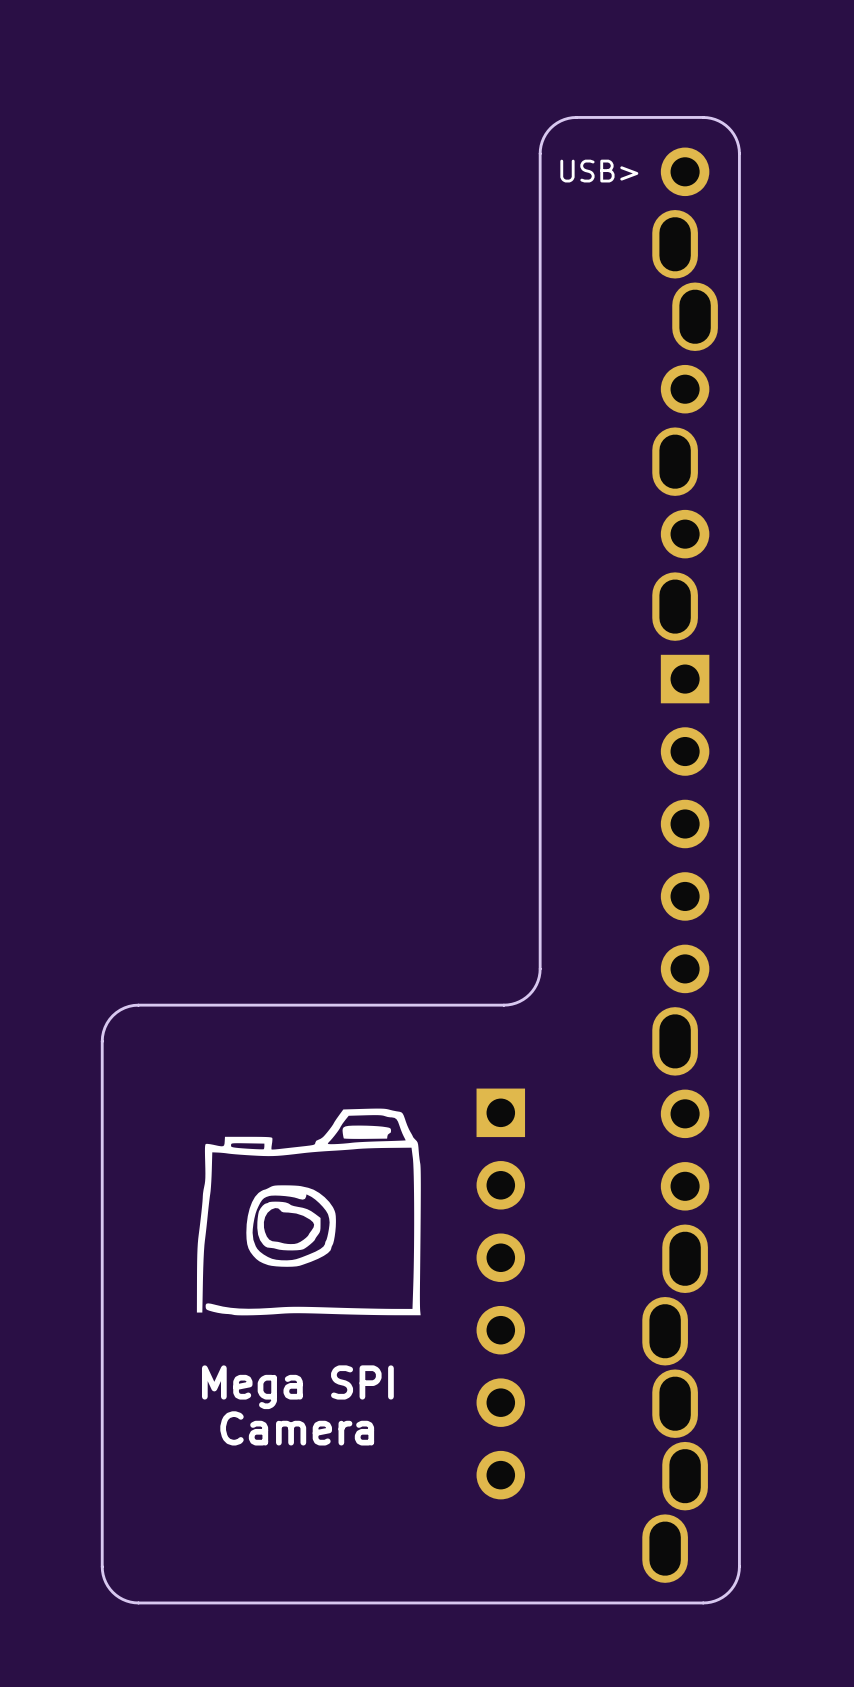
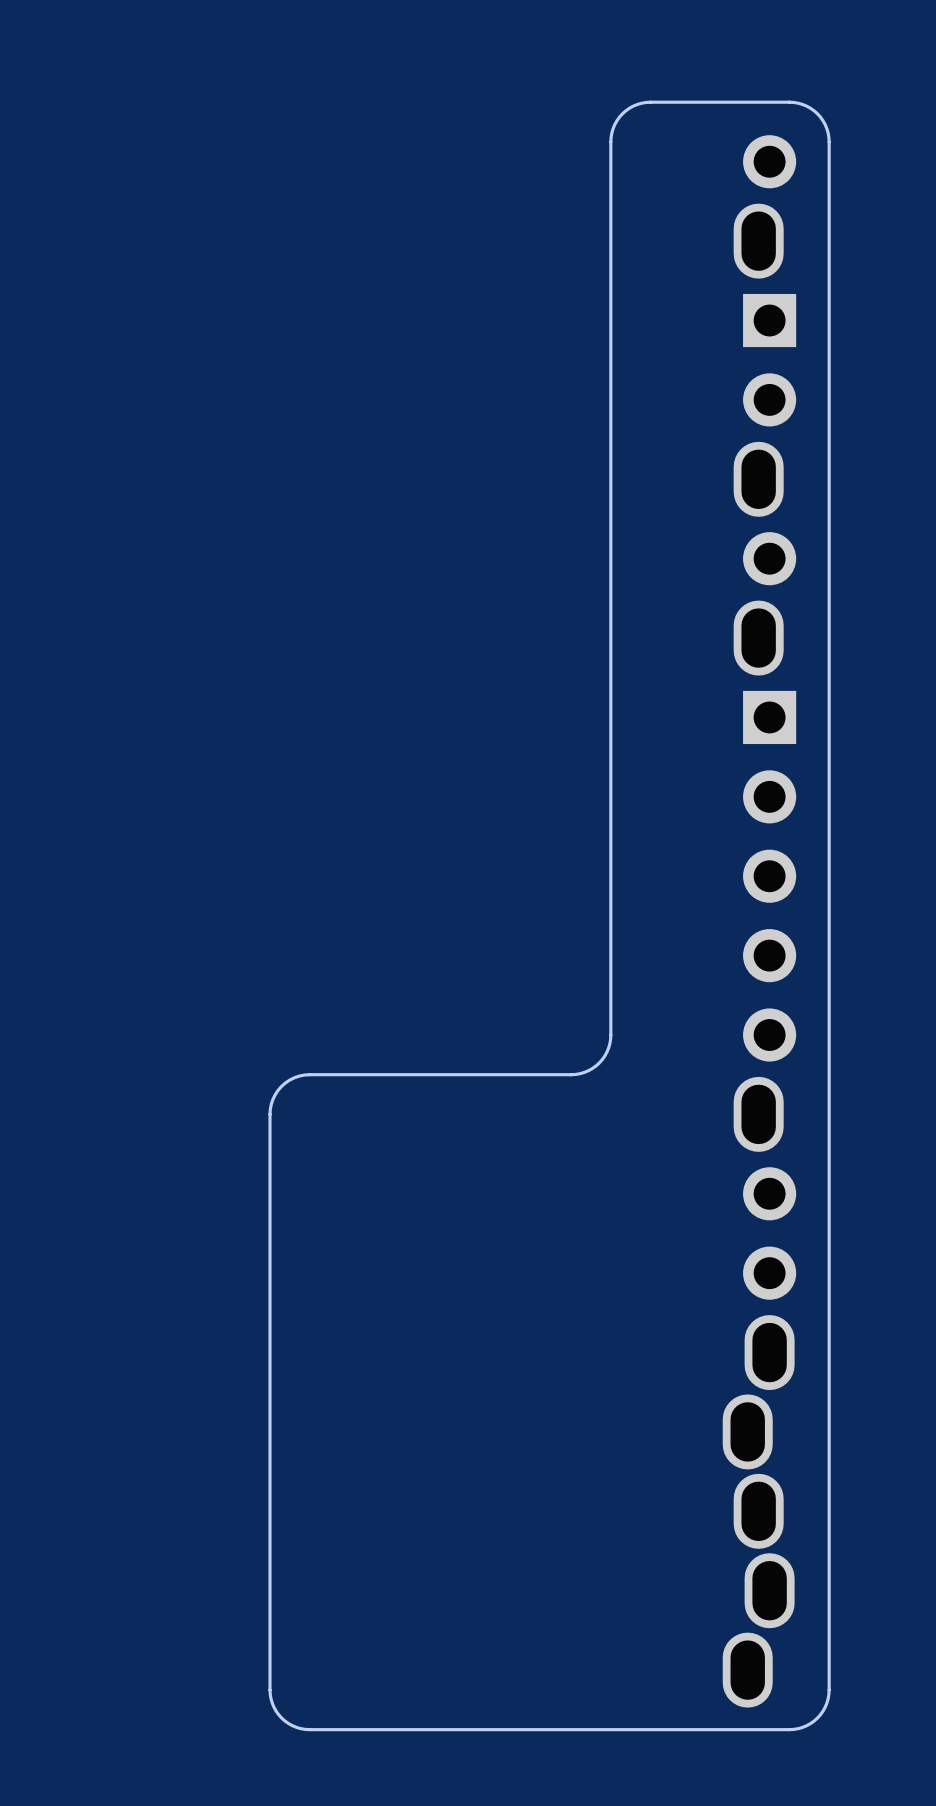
part footprint: [642, 147, 718, 1583] -> [722, 135, 797, 1708]
text: USB> (599, 171) -> none
board edge: (265, 1005) (129, 1006) (120, 1010) (109, 1019) (103, 1032) (102, 1041) (102, 1566) (104, 1578) (115, 1595) (134, 1602) (265, 1602) -> (309, 1074) (294, 1077) (281, 1086) (273, 1099) (270, 1114) (270, 1694) (273, 1707) (281, 1718) (292, 1725) (309, 1729)
drawing: [196, 1108, 421, 1316] -> none
part: (500, 1293) -> none
text: Mega SPI (297, 1387) -> none
text: Camera (297, 1428) -> none

